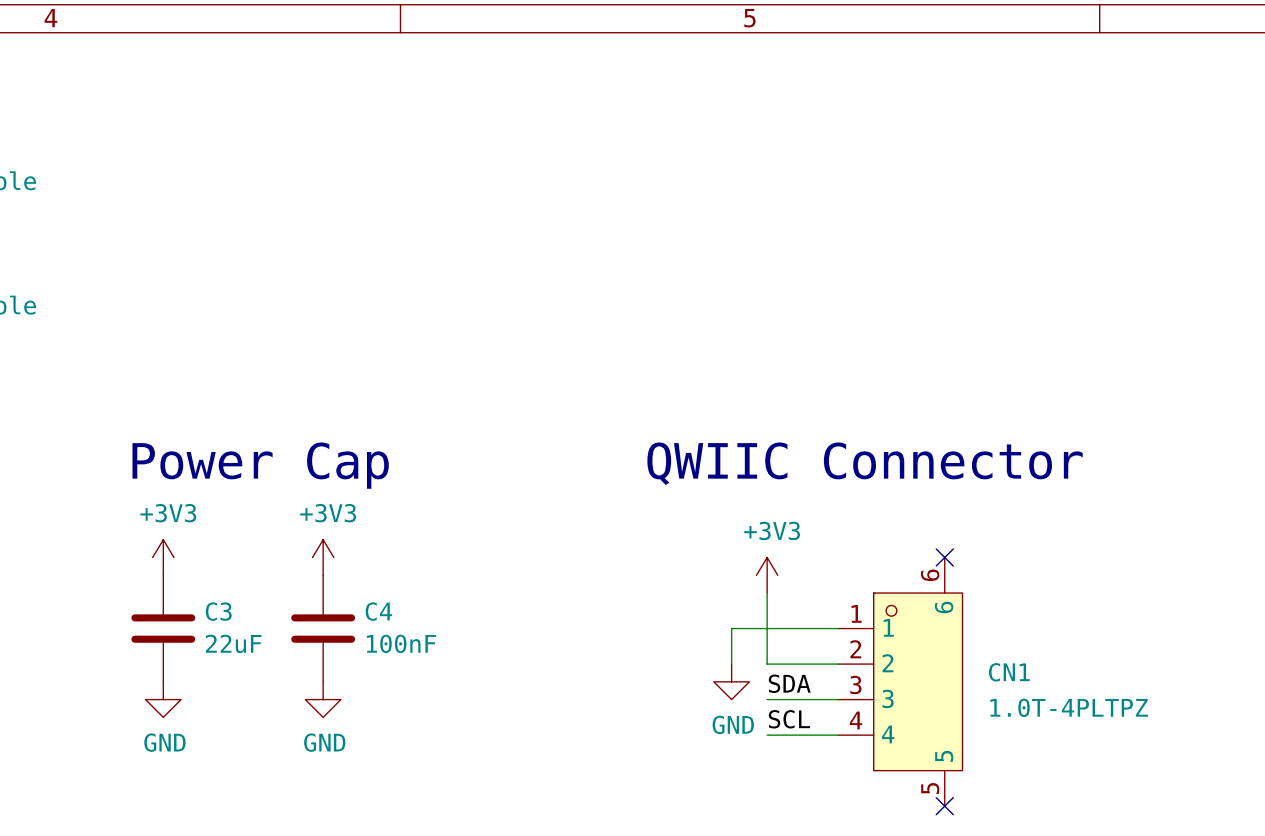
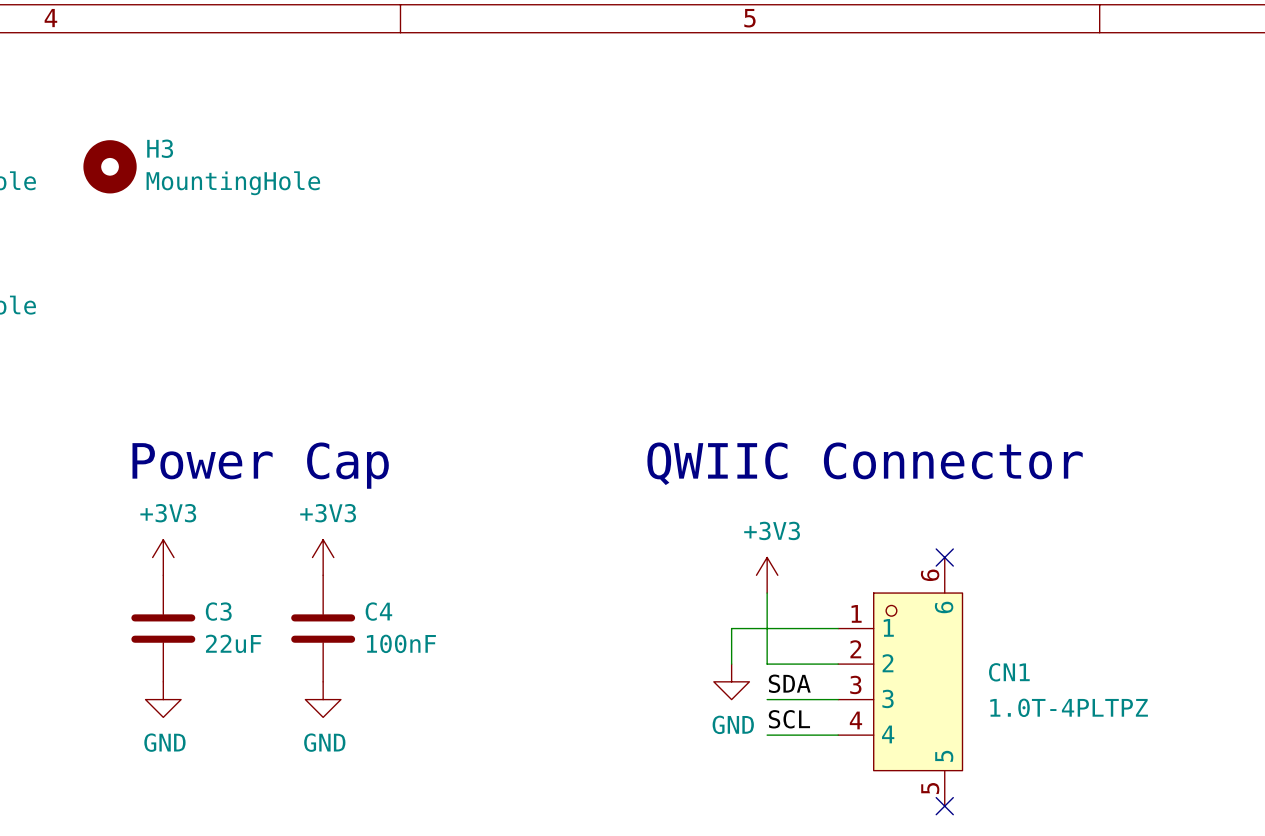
H3: none -> MountingHole (110, 166)

